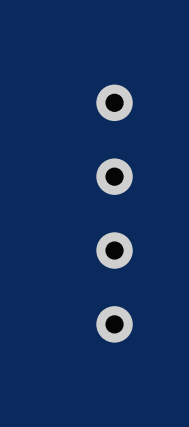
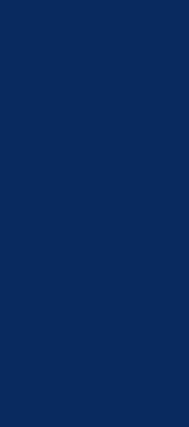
part: (114, 102) -> none
part: (114, 176) -> none
part: (114, 250) -> none
part: (114, 324) -> none

